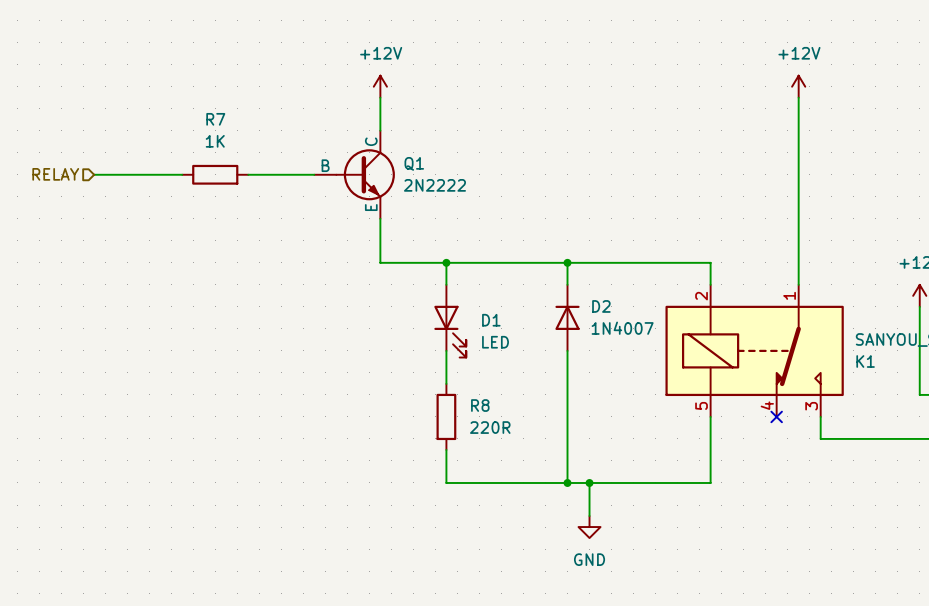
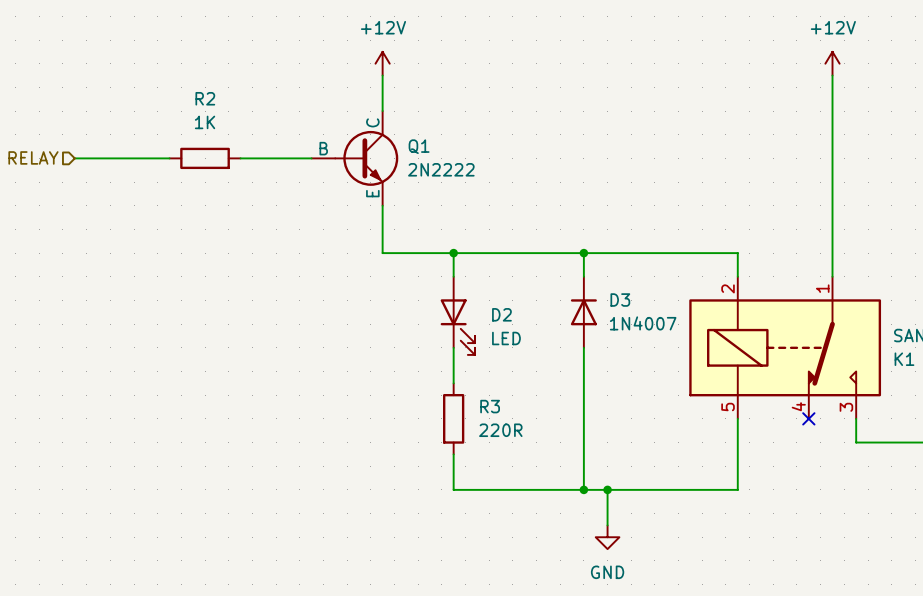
R7 name: R7 (215, 119) -> R2 (205, 98)
D2 name: D2 (601, 306) -> D3 (620, 300)
D1 name: D1 (491, 320) -> D2 (501, 314)
R8 name: R8 (480, 405) -> R3 (490, 406)

